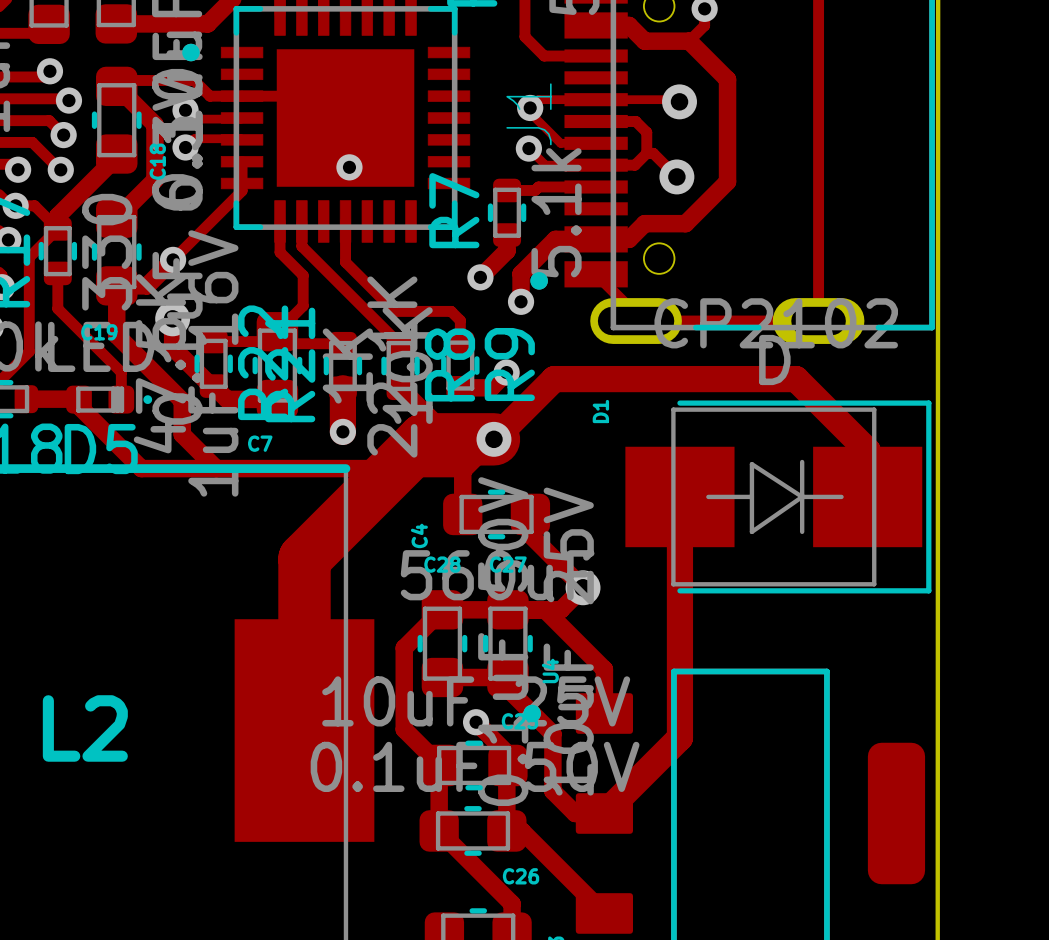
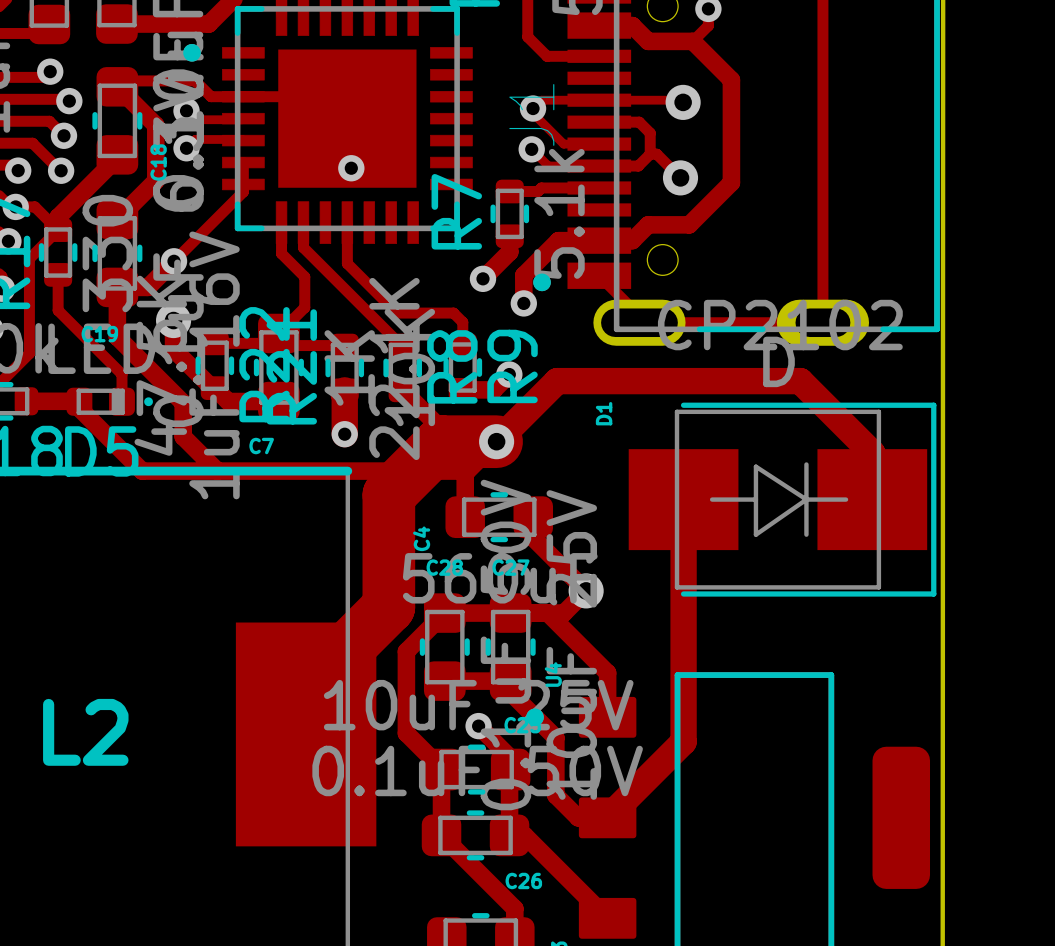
track: (439, 439) (424, 439) (304, 558) (304, 686) -> (442, 441) (388, 495) (388, 606) (306, 689)

